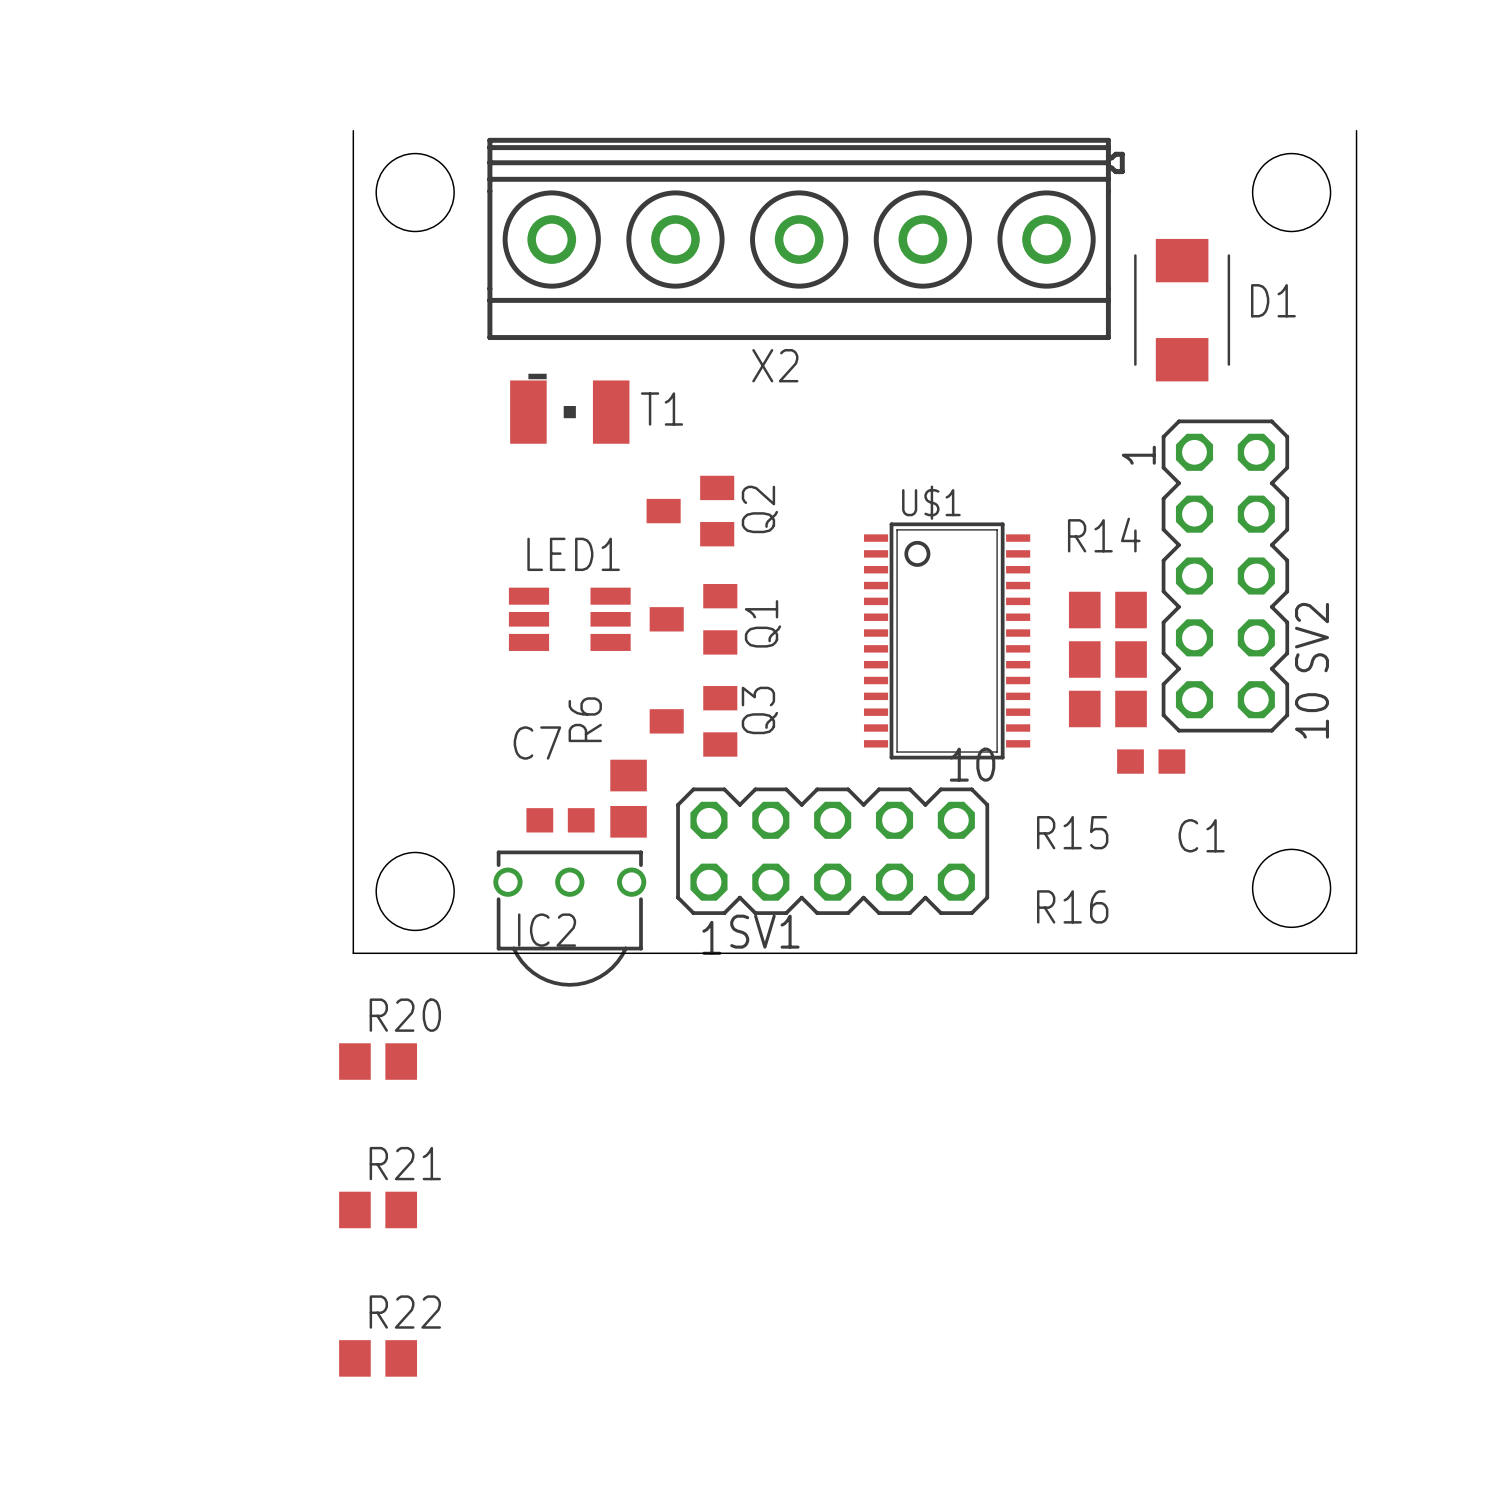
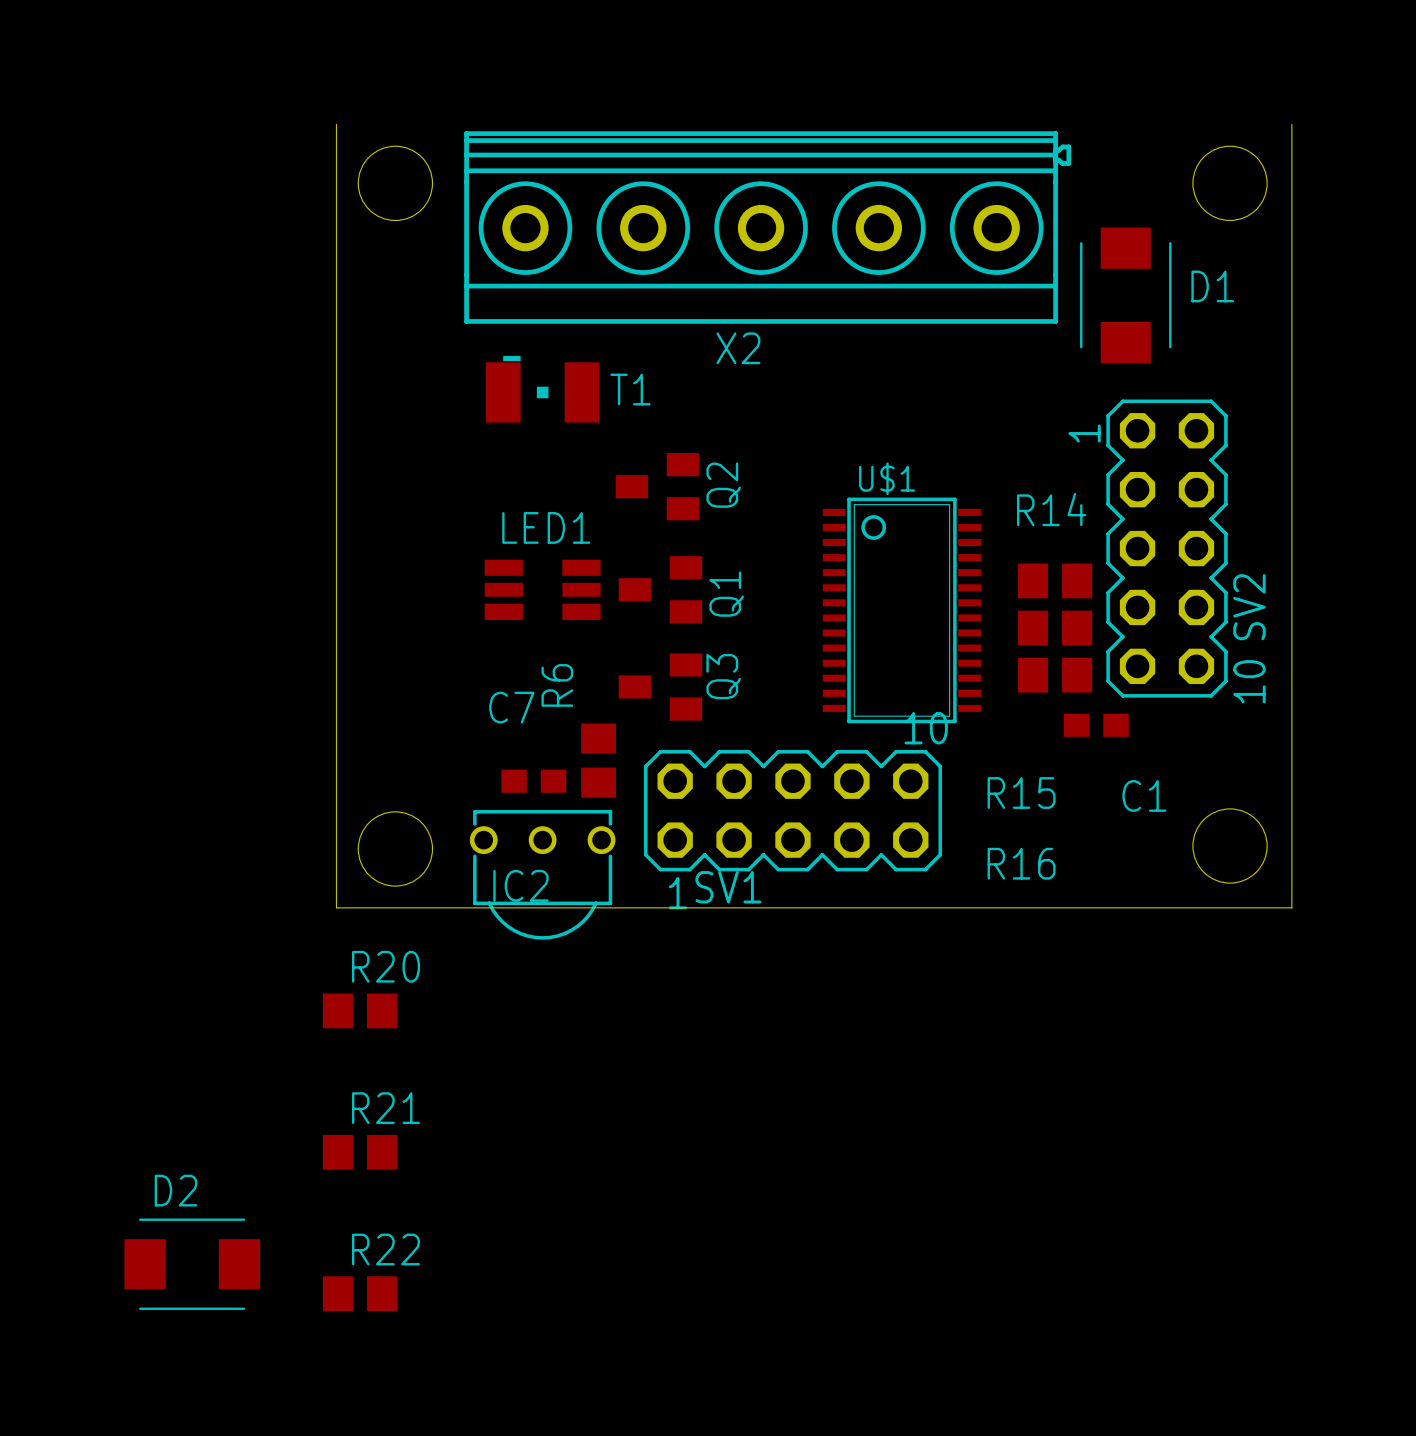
D2: none -> (192, 1264)

